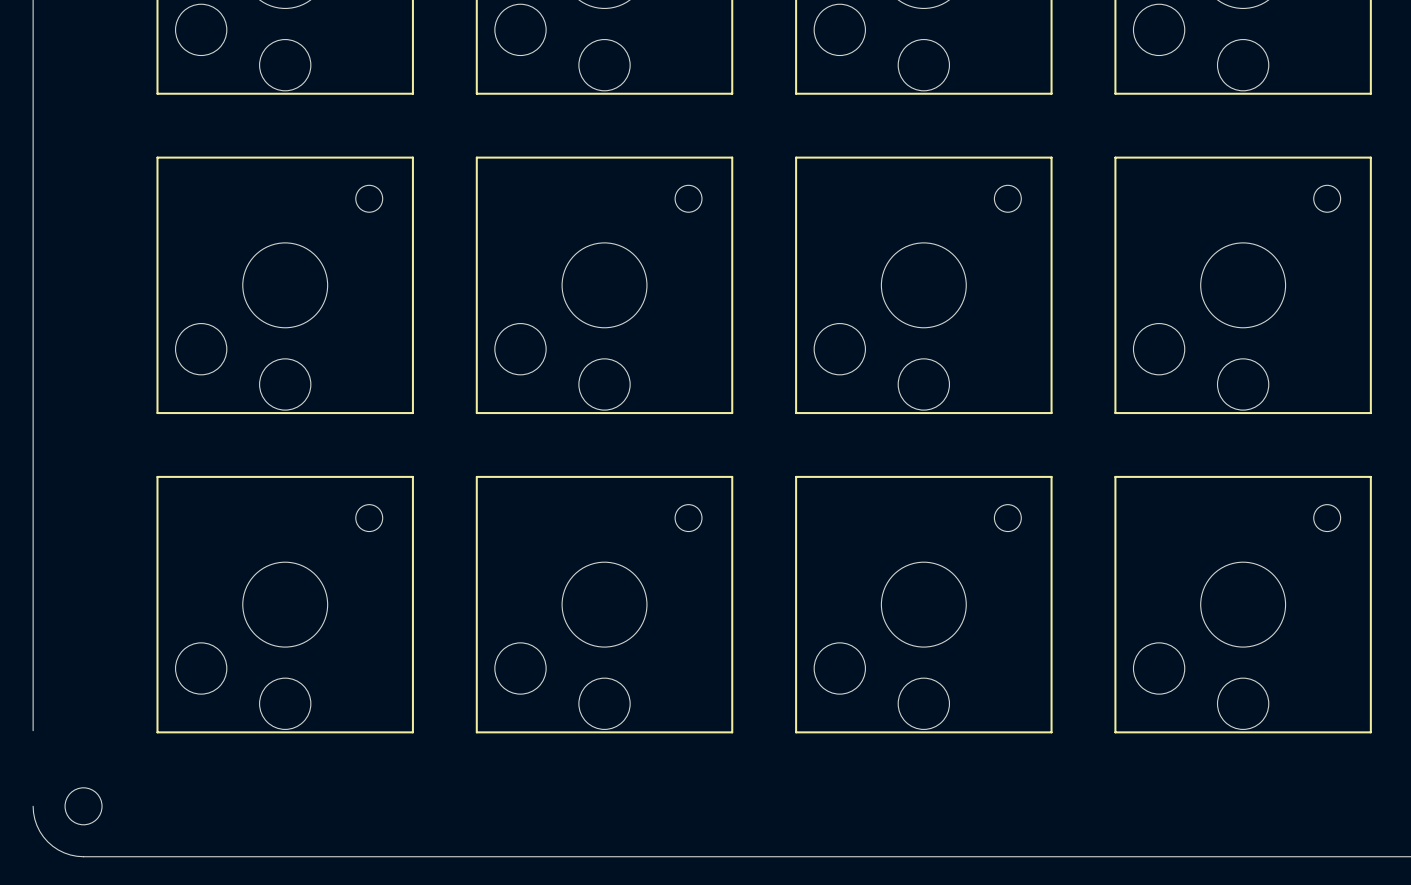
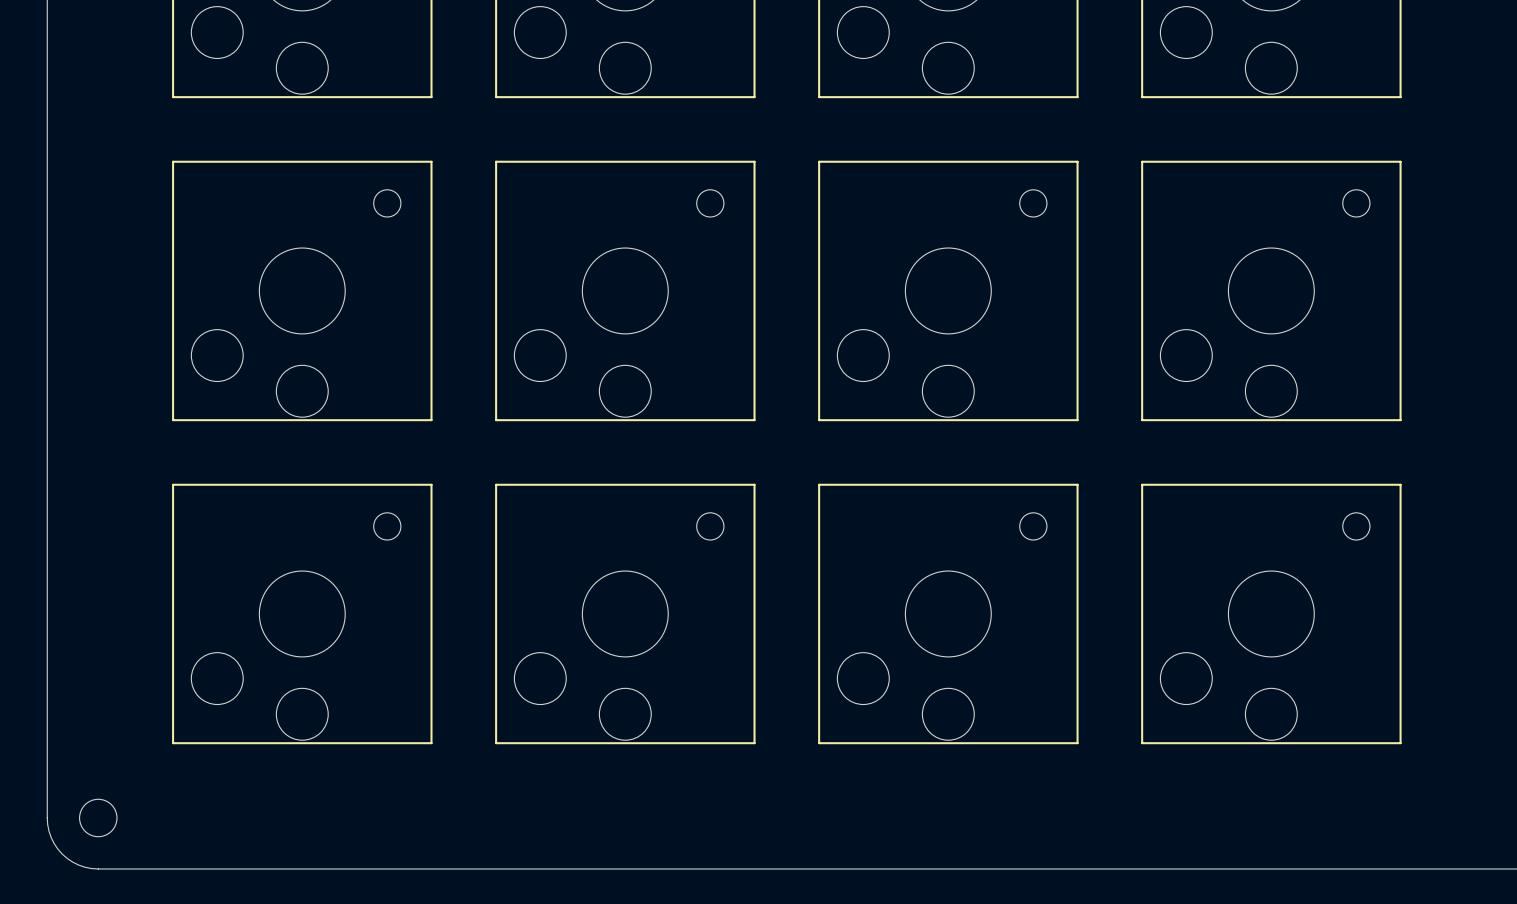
board edge: none -> (47, 741) (47, 817)

